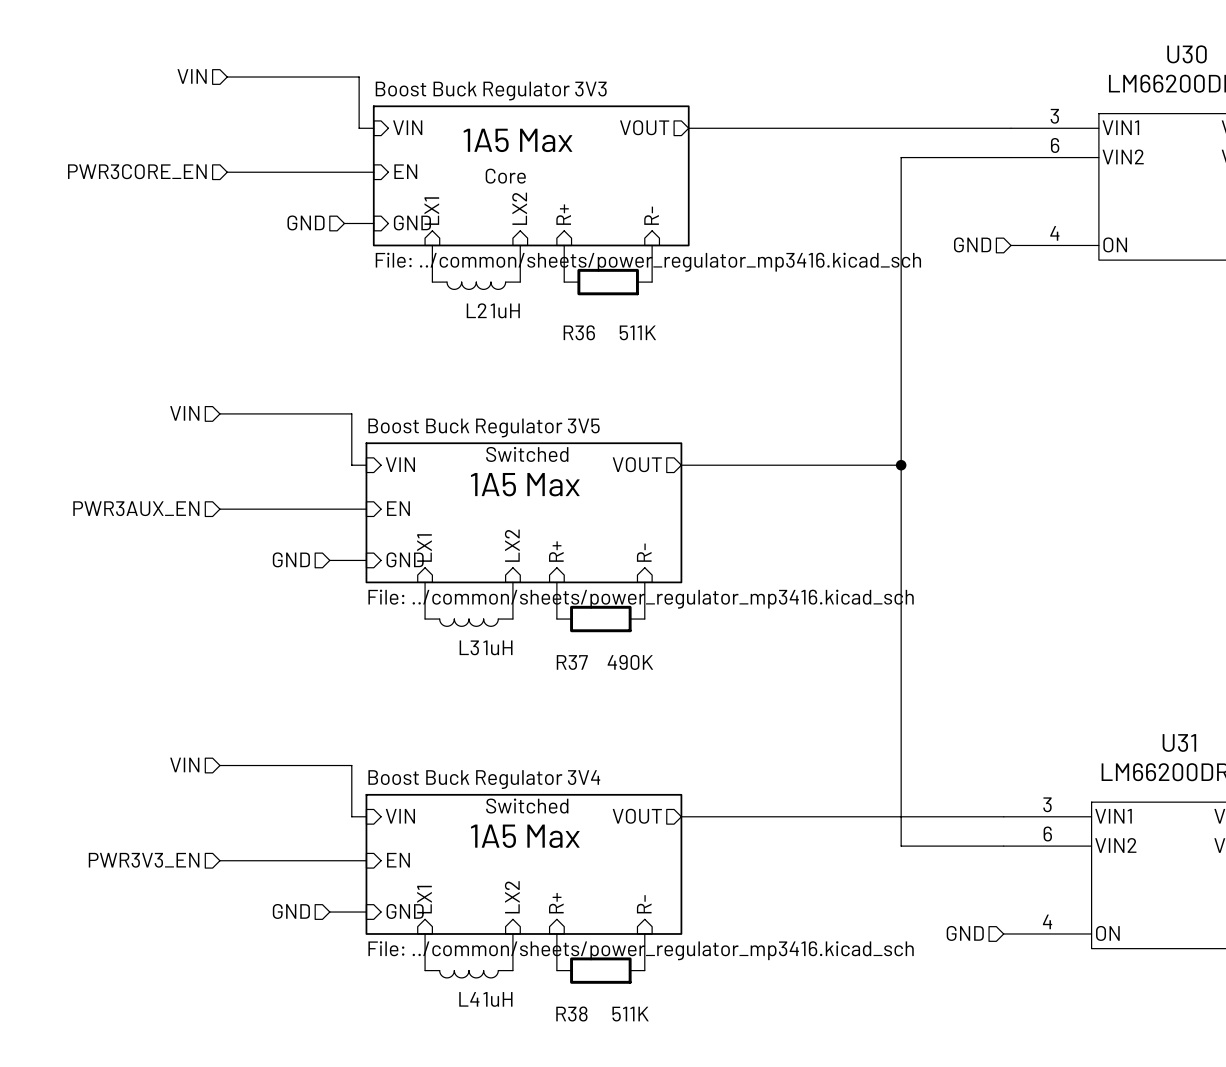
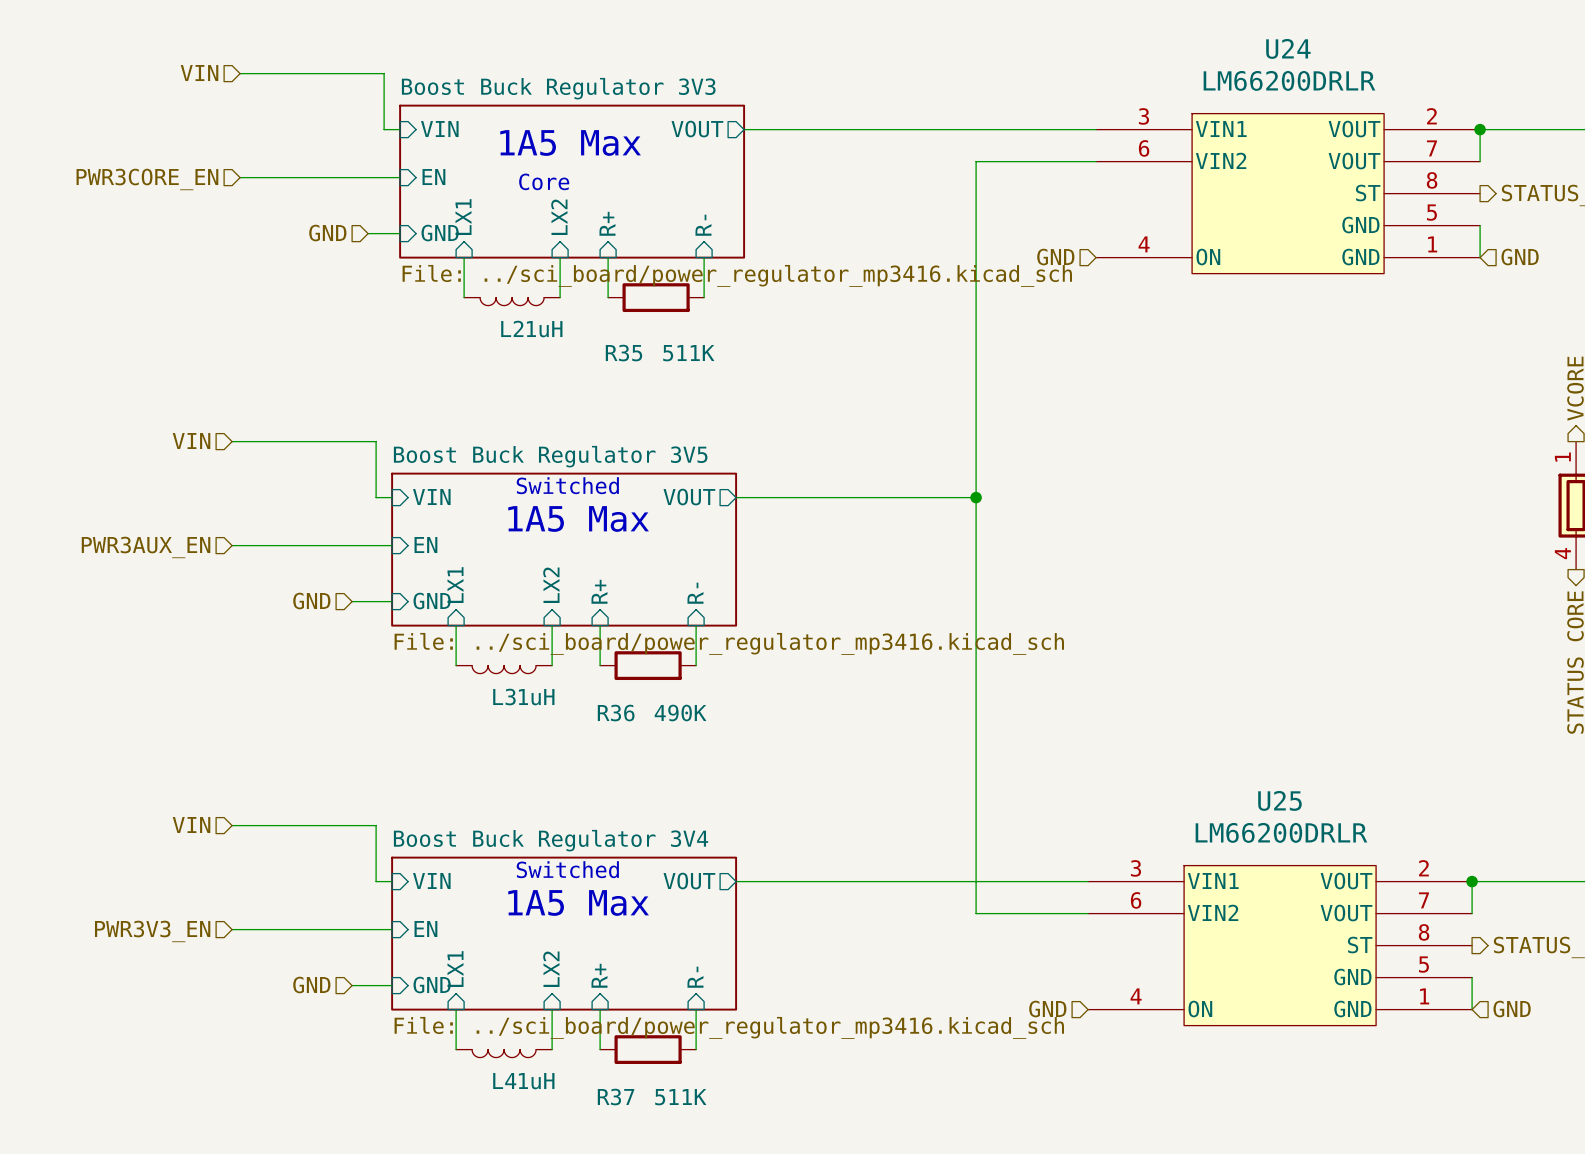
U30 name: U30 (1187, 54) -> U24 (1288, 48)
sheet Boost Buck Regulator 3V3 value: File: ../common/sheets/power_regulator_mp3416.kicad_sch (648, 262) -> File: ../sci_board/power_regulator_mp3416.kicad_sch (737, 275)
R36 name: R36 (579, 332) -> R35 (623, 353)
sheet Boost Buck Regulator 3V5 value: File: ../common/sheets/power_regulator_mp3416.kicad_sch (641, 599) -> File: ../sci_board/power_regulator_mp3416.kicad_sch (729, 643)
R37 name: R37 (572, 662) -> R36 (616, 713)
U31 name: U31 (1179, 742) -> U25 (1279, 800)
sheet Boost Buck Regulator 3V4 value: File: ../common/sheets/power_regulator_mp3416.kicad_sch (641, 950) -> File: ../sci_board/power_regulator_mp3416.kicad_sch (729, 1027)
R38 name: R38 (571, 1013) -> R37 (616, 1097)

